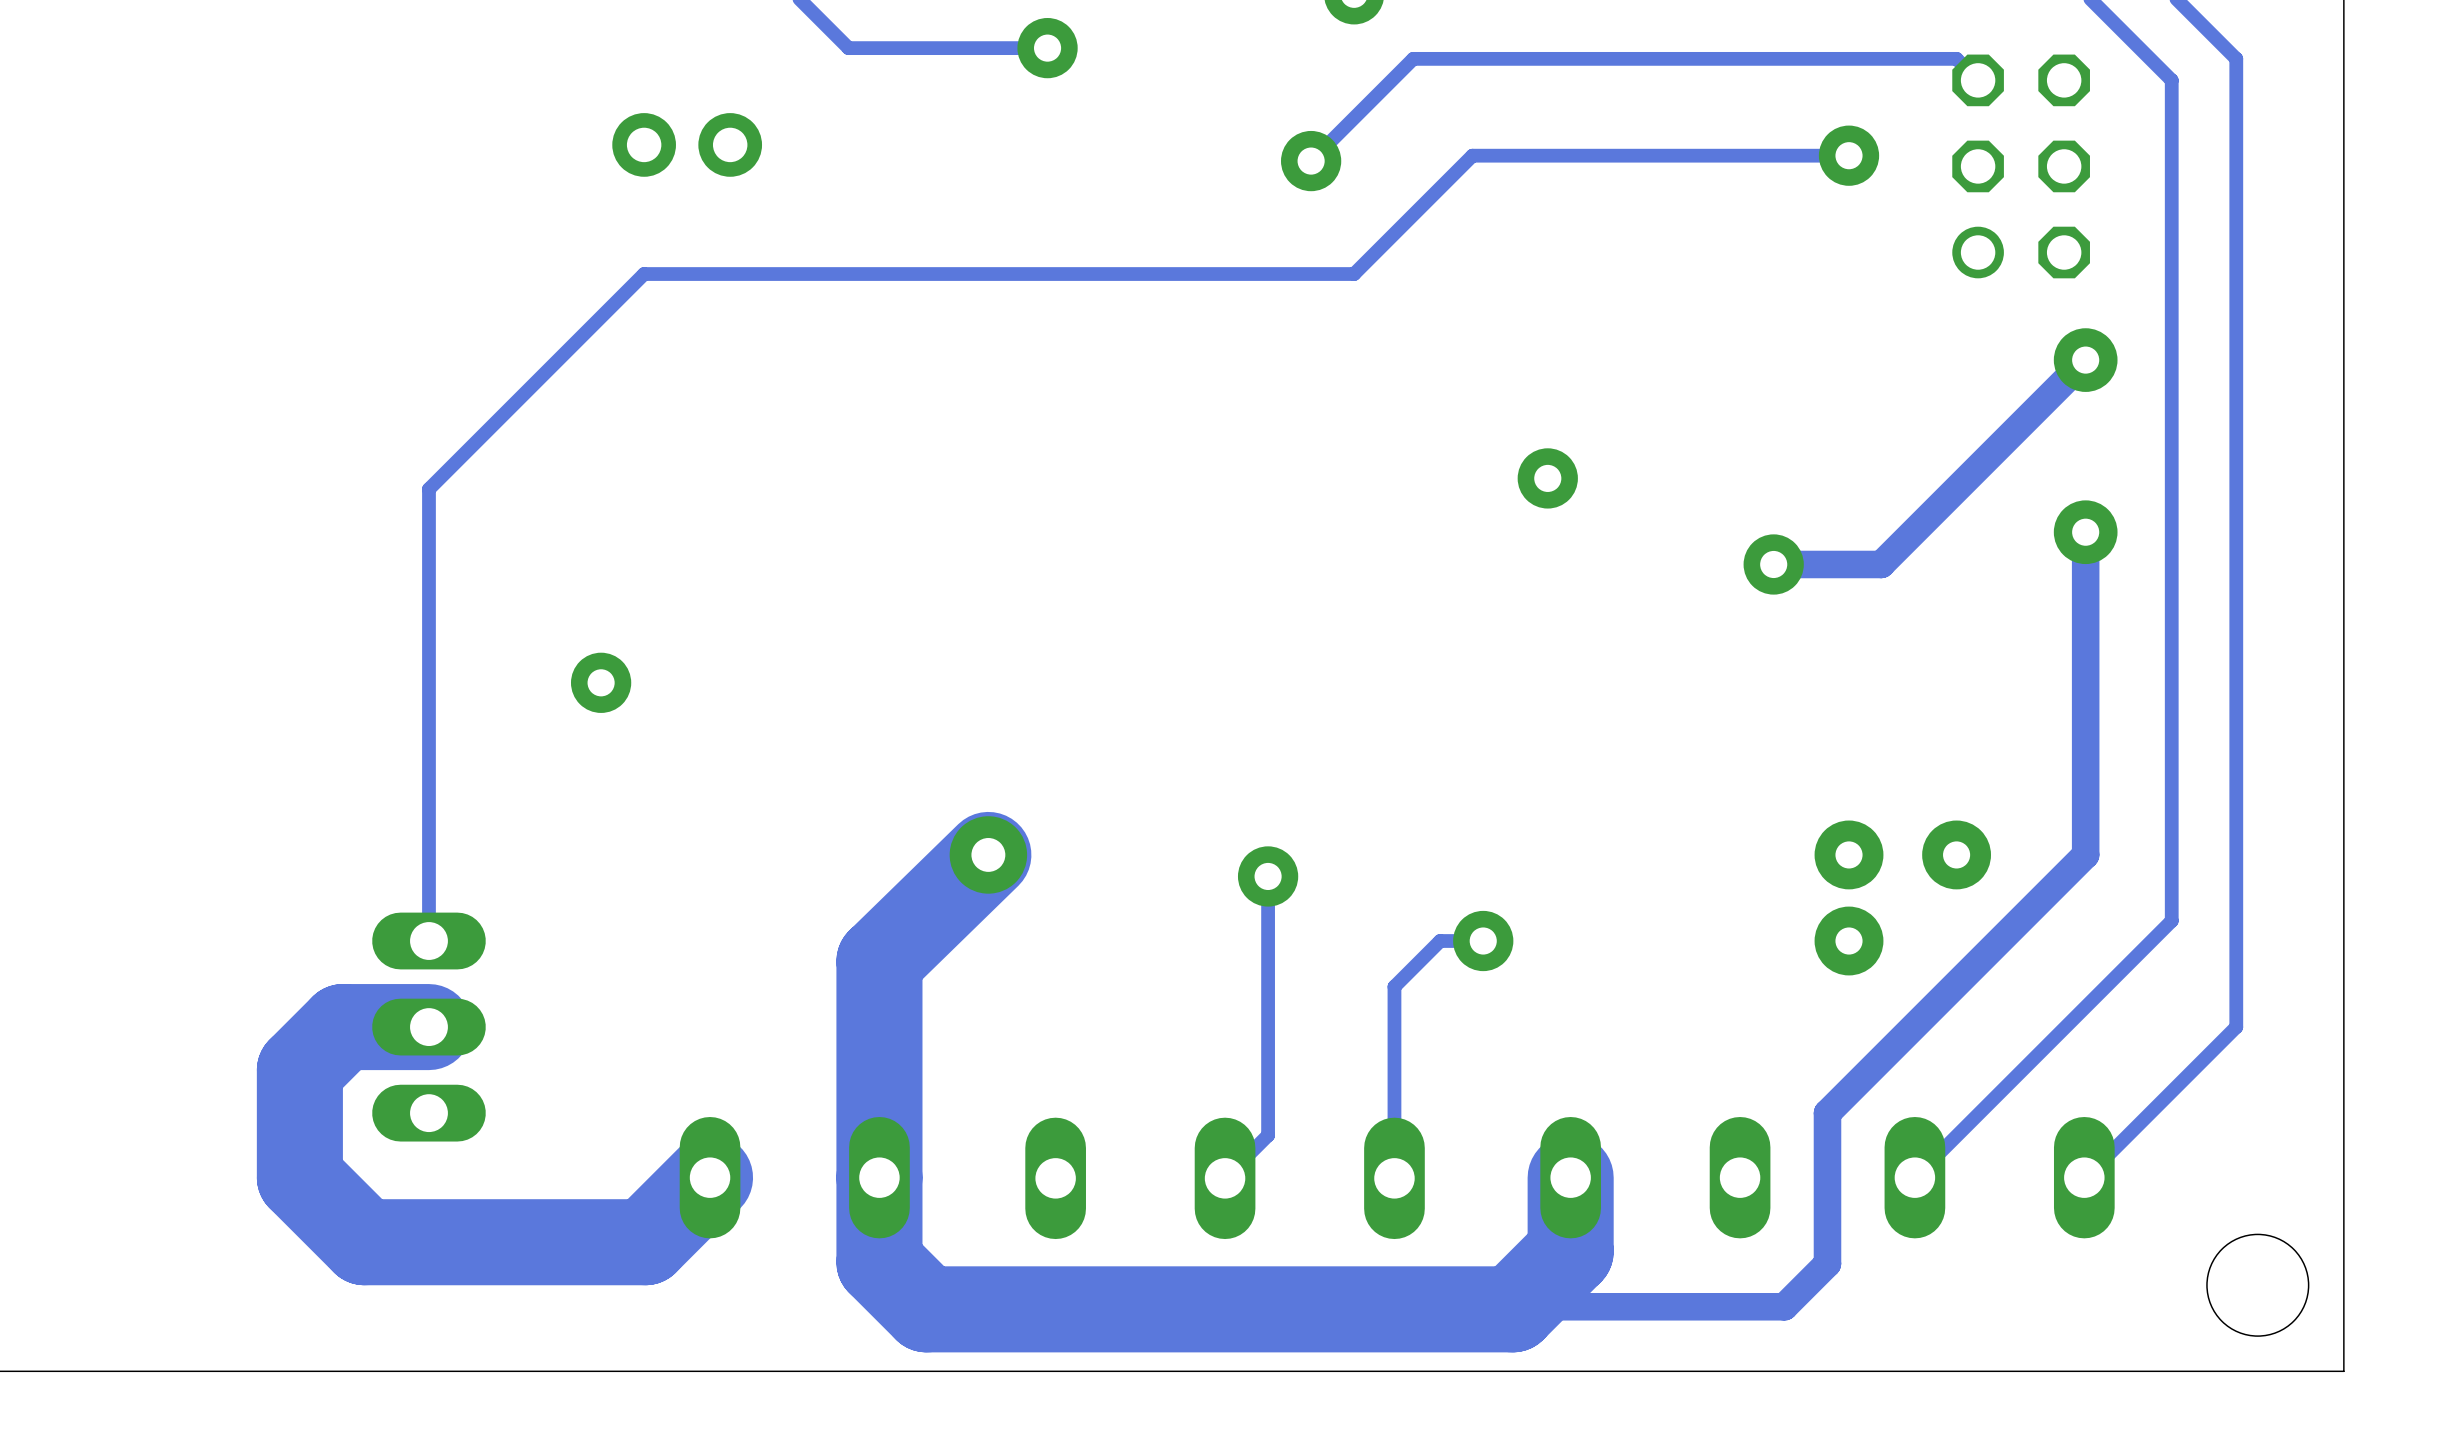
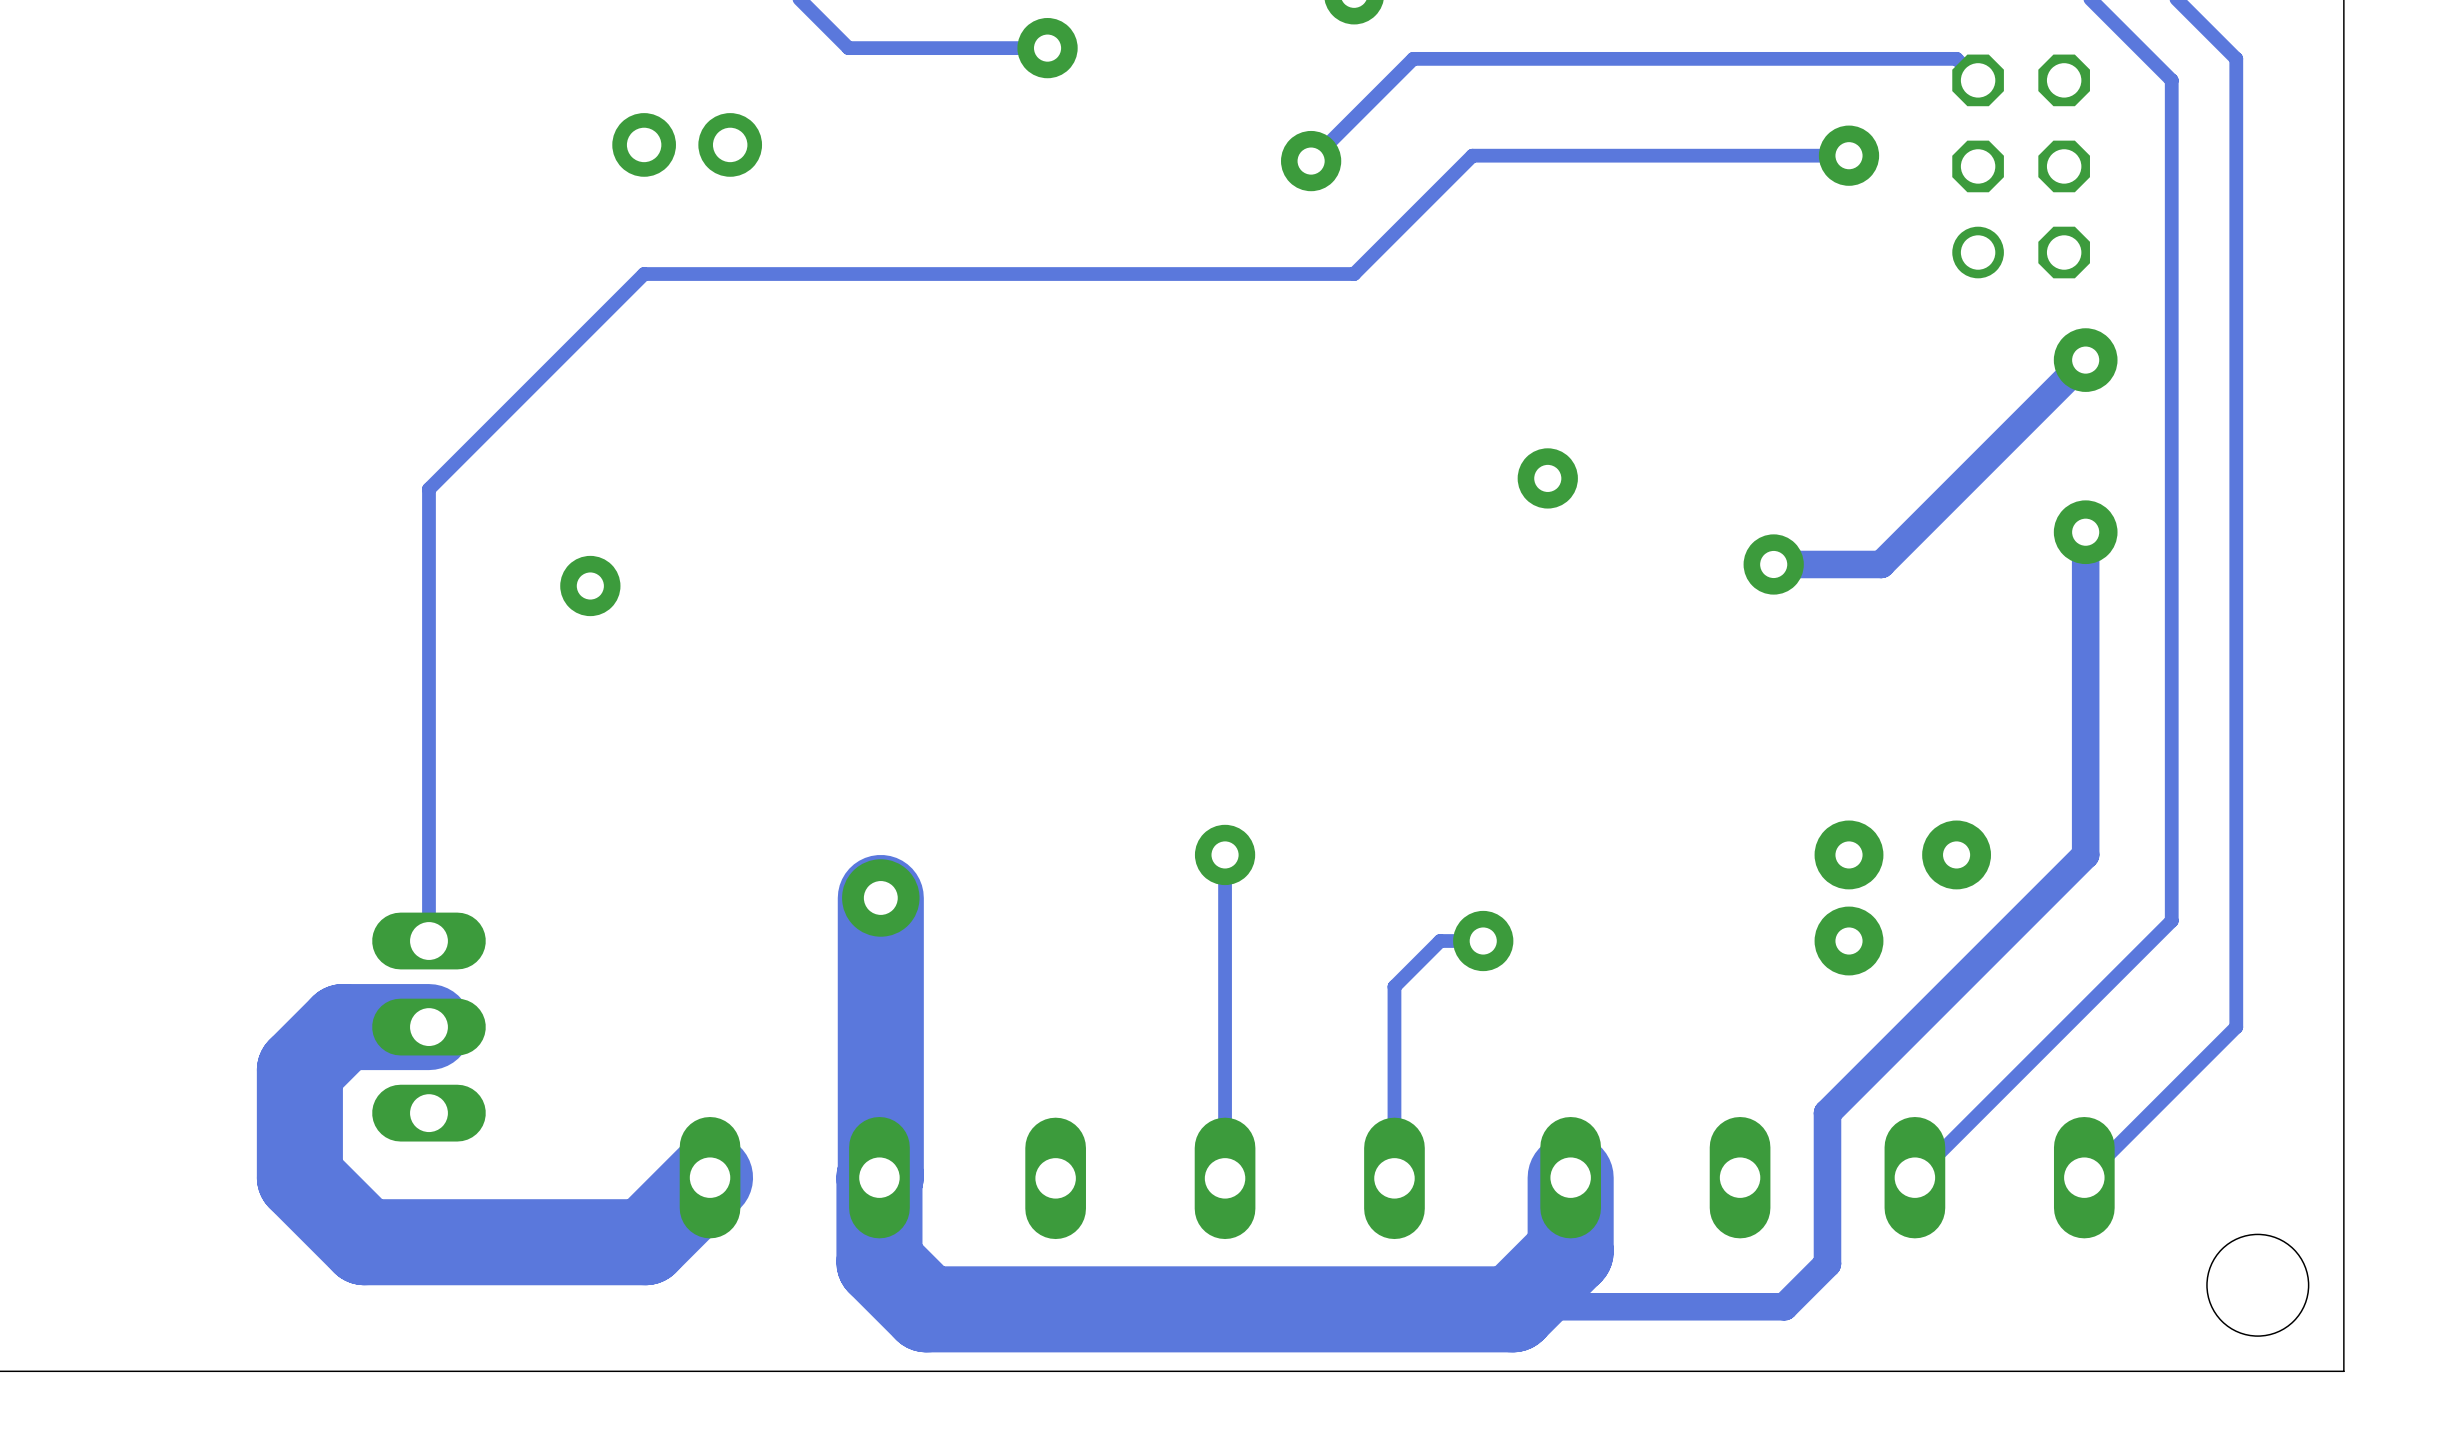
via position: (601, 682) -> (590, 586)
track: (988, 854) (879, 961) (879, 1177) -> (880, 897) (879, 1177)
via position: (988, 854) -> (880, 897)
track: (1268, 876) (1268, 1135) (1225, 1178) -> (1225, 854) (1225, 1178)
via position: (1268, 876) -> (1225, 854)

